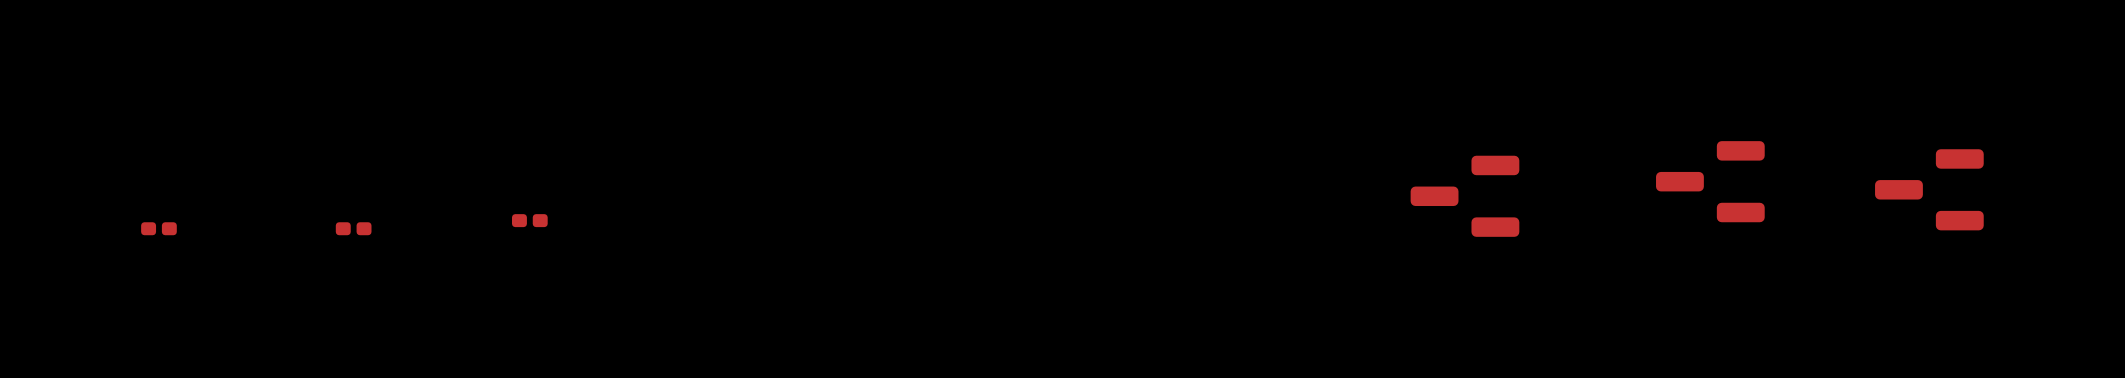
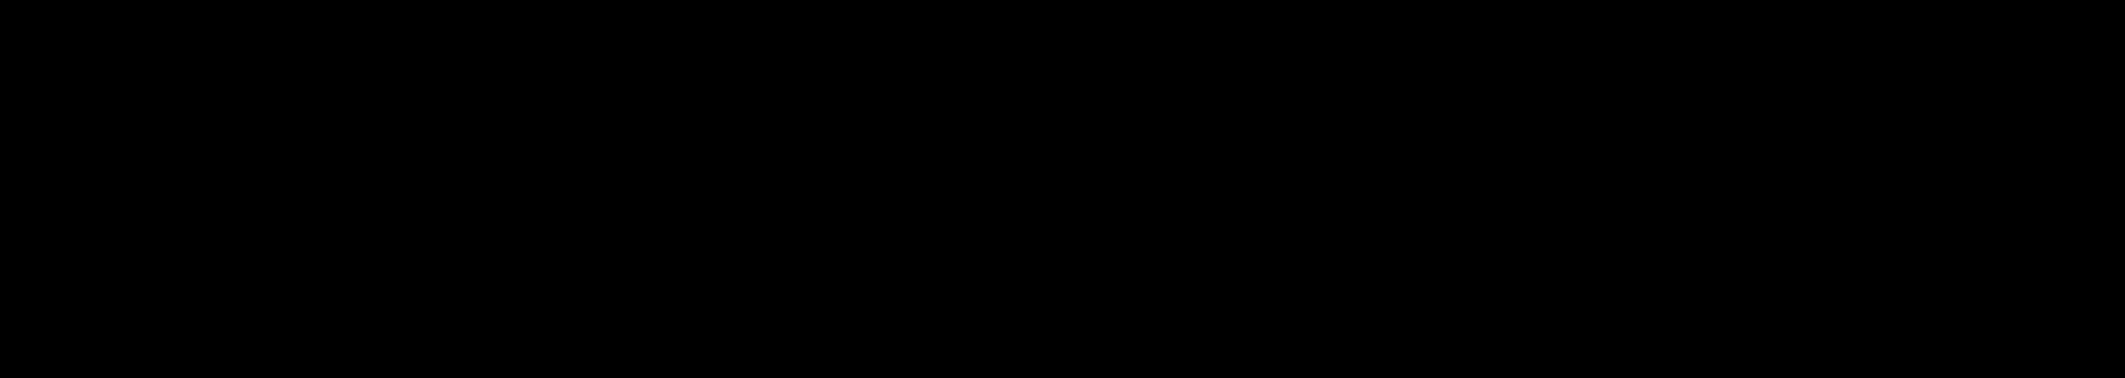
part: (1710, 181) -> none
part: (1929, 189) -> none
part: (1464, 196) -> none
part: (529, 220) -> none
part: (158, 228) -> none
part: (353, 228) -> none

